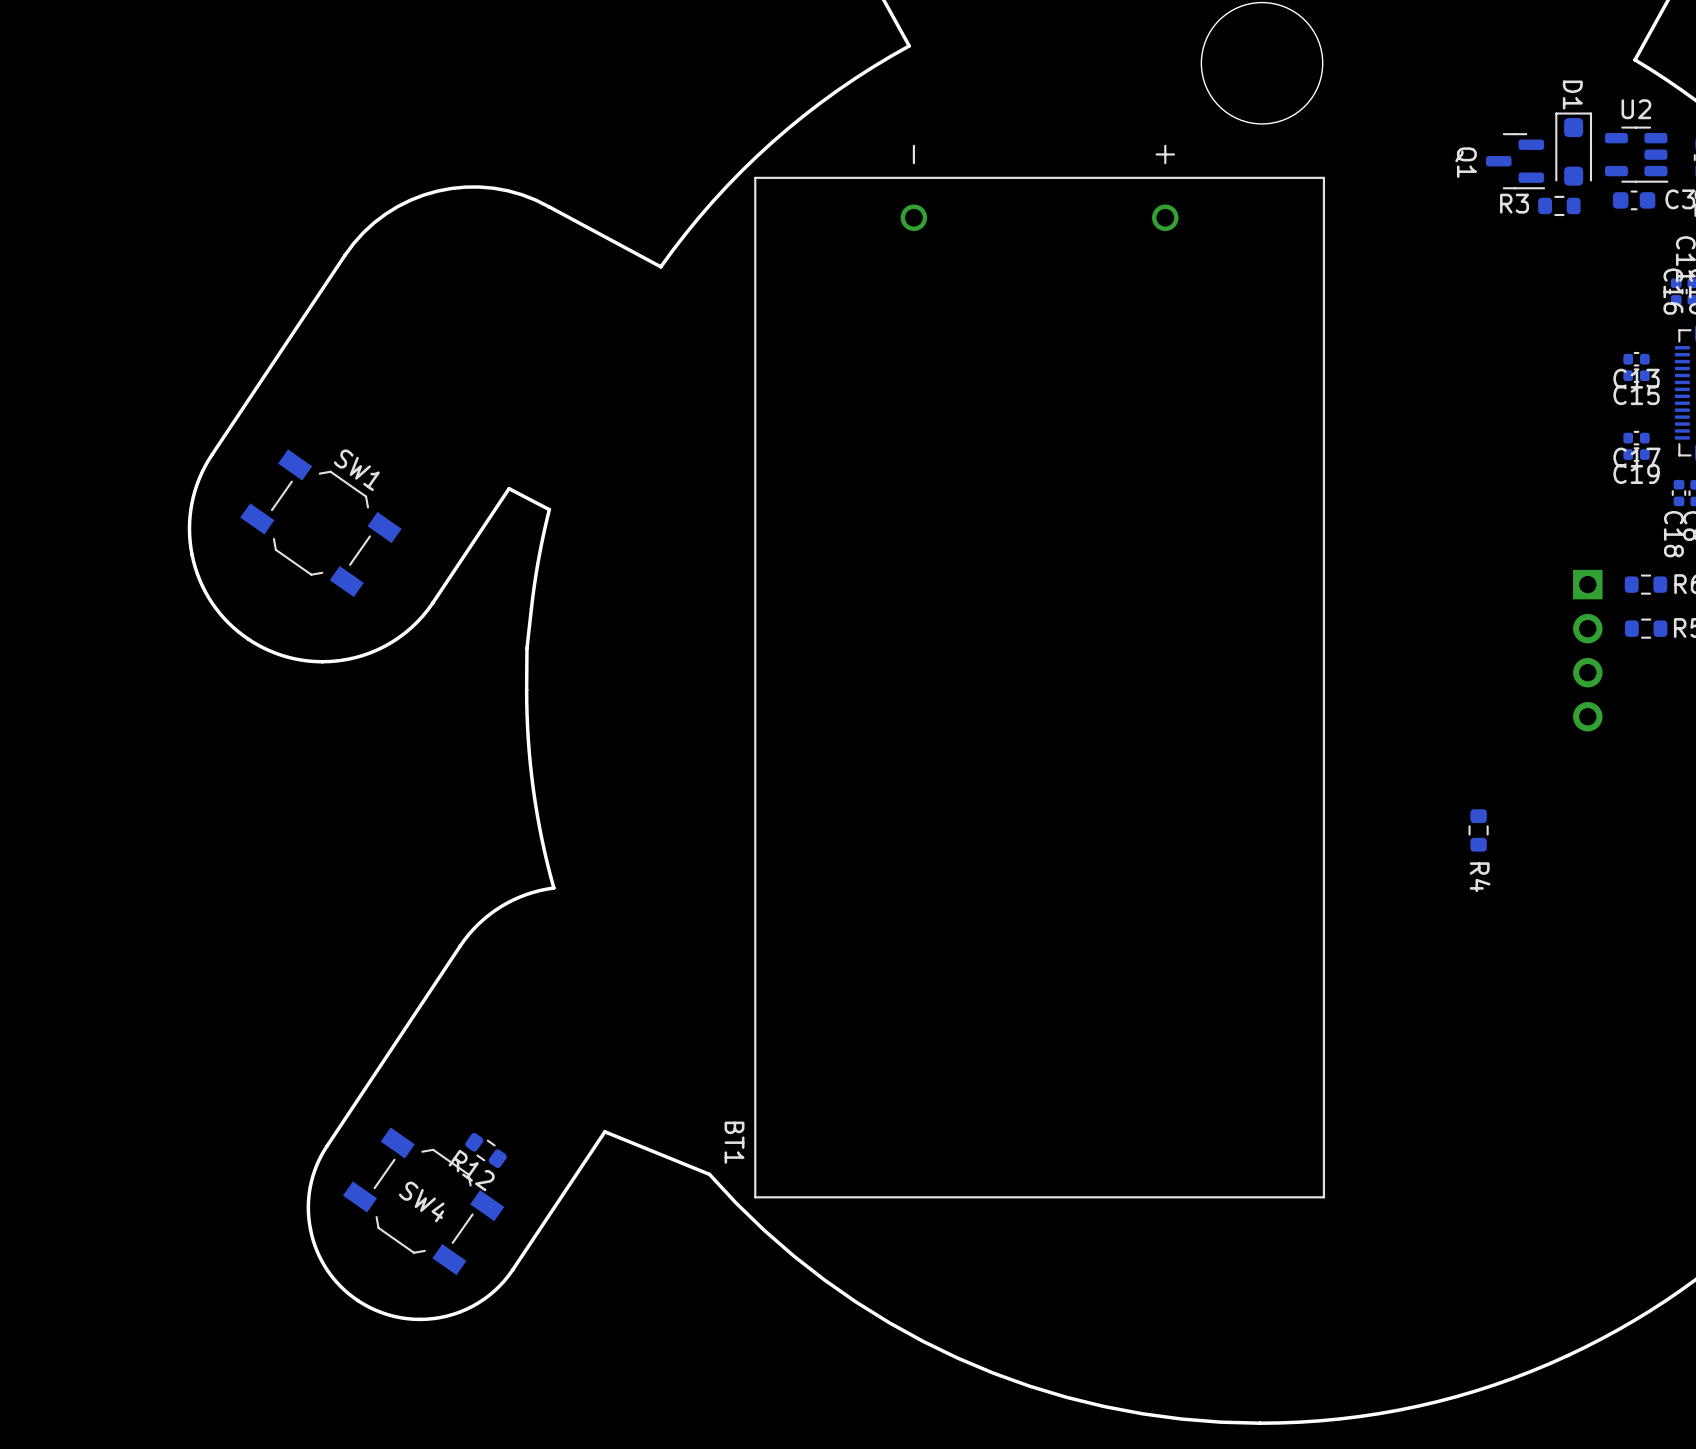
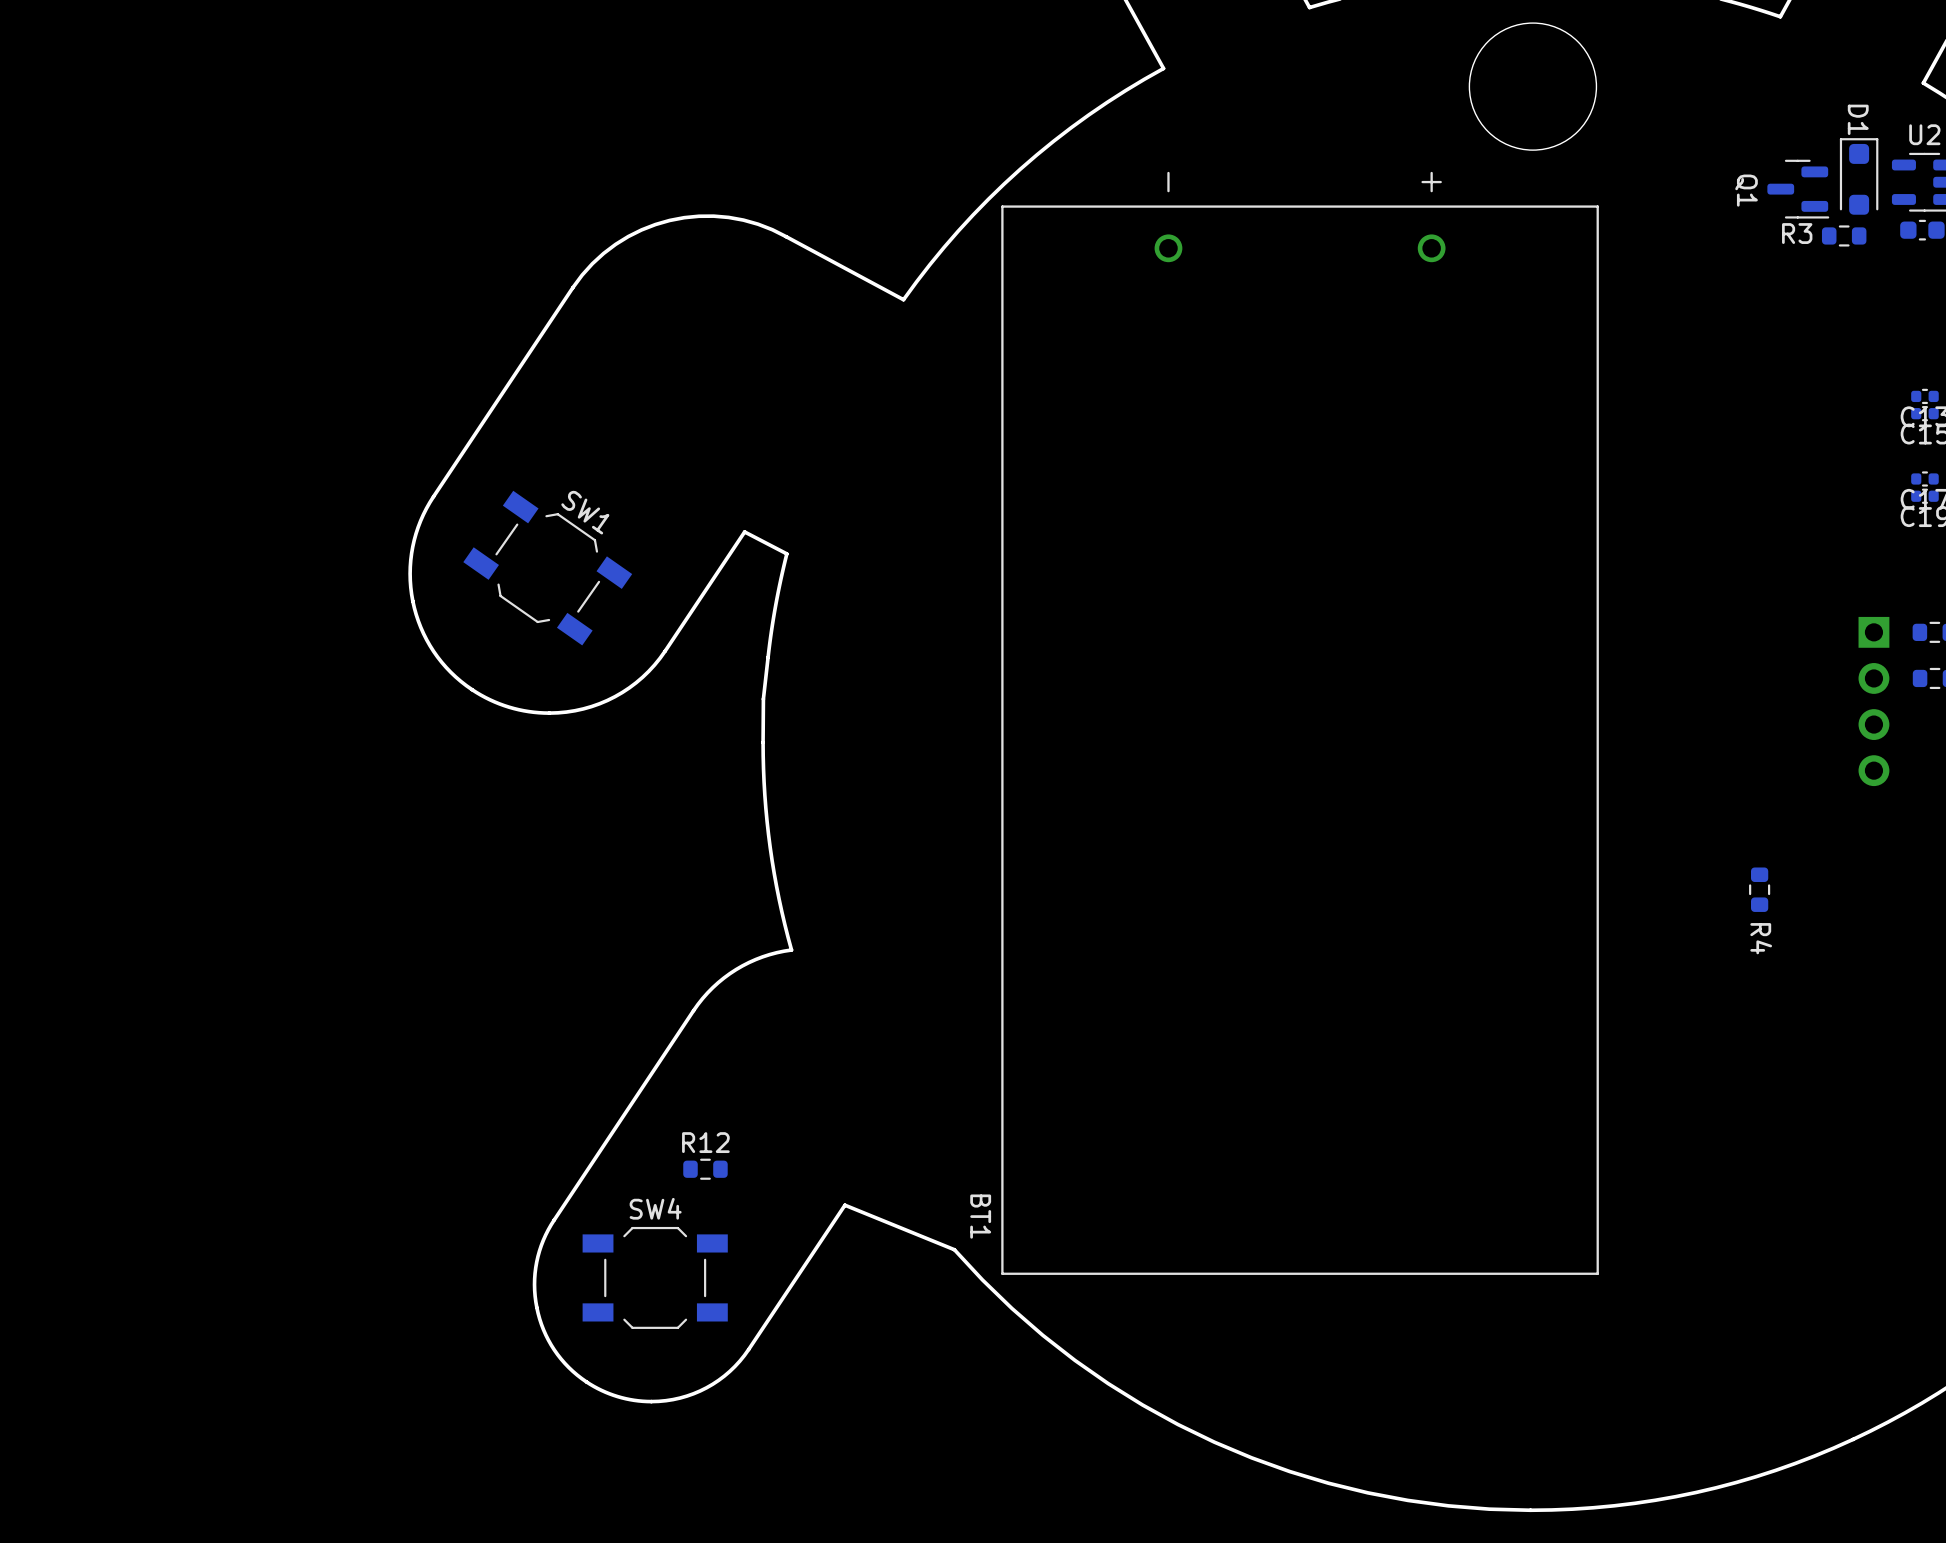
R12 rotation: 0° (486, 1150) -> 35° counterclockwise (705, 1169)
R12 position: (486, 1150) -> (705, 1169)
R12 name position: R12 (471, 1170) -> R12 (705, 1142)
SW4 name position: SW4 (421, 1201) -> SW4 (655, 1208)
SW4 rotation: 0° (423, 1201) -> 35° counterclockwise (655, 1277)

